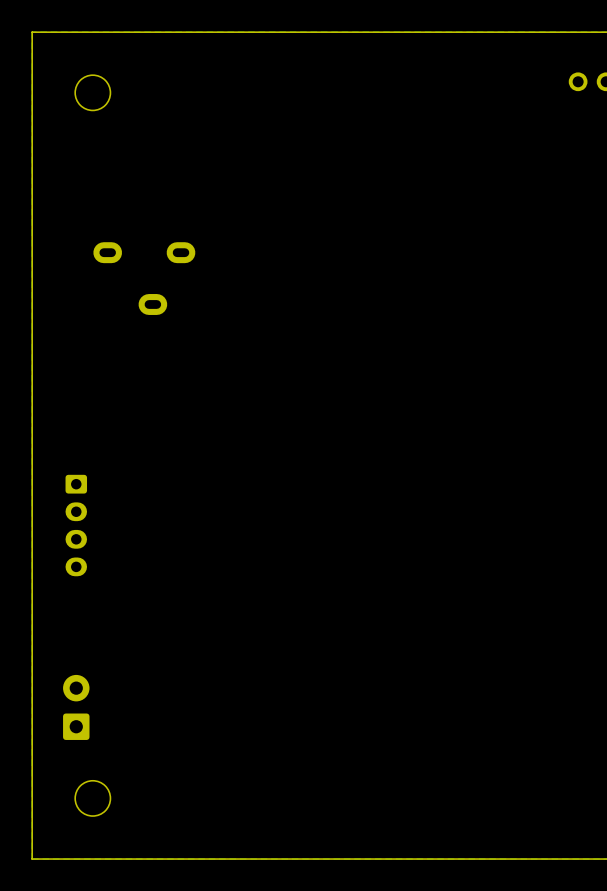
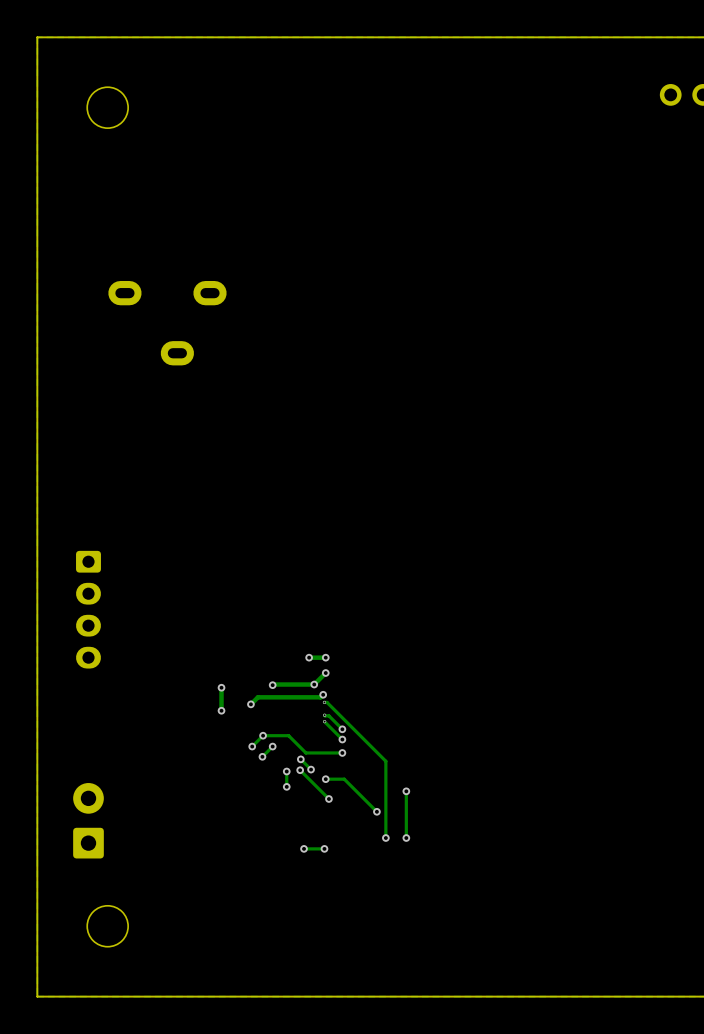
via: none -> (309, 657)
track: none -> (325, 657) (309, 657)
via: none -> (325, 657)
track: none -> (325, 673) (314, 684) (272, 685)
via: none -> (325, 673)
via: none -> (272, 685)
via: none -> (314, 684)
track: none -> (221, 687) (221, 710)
via: none -> (221, 687)
track: none -> (323, 694) (320, 697) (257, 697) (250, 704)
via: none -> (323, 694)
track: none -> (324, 702) (327, 702) (385, 761) (385, 838)
via: none -> (324, 702)
via: none -> (250, 704)
via: none -> (221, 710)
track: none -> (324, 715) (328, 715) (342, 729)
via: none -> (324, 715)
track: none -> (324, 721) (342, 739)
via: none -> (324, 721)
via: none -> (342, 729)
via: none -> (263, 735)
via: none -> (342, 739)
track: none -> (252, 746) (263, 735) (288, 735) (305, 752) (342, 752)
via: none -> (252, 746)
track: none -> (272, 746) (262, 756)
via: none -> (272, 746)
via: none -> (342, 752)
via: none -> (262, 756)
track: none -> (300, 759) (311, 769)
via: none -> (300, 759)
track: none -> (300, 770) (328, 799)
via: none -> (300, 770)
via: none -> (311, 769)
track: none -> (286, 771) (286, 786)
via: none -> (286, 771)
track: none -> (325, 779) (344, 779) (376, 811)
via: none -> (325, 779)
via: none -> (286, 786)
track: none -> (406, 791) (406, 838)
via: none -> (406, 791)
via: none -> (328, 799)
via: none -> (376, 811)
via: none -> (385, 838)
via: none -> (406, 838)
via: none -> (304, 848)
track: none -> (324, 848) (304, 848)
via: none -> (324, 848)

